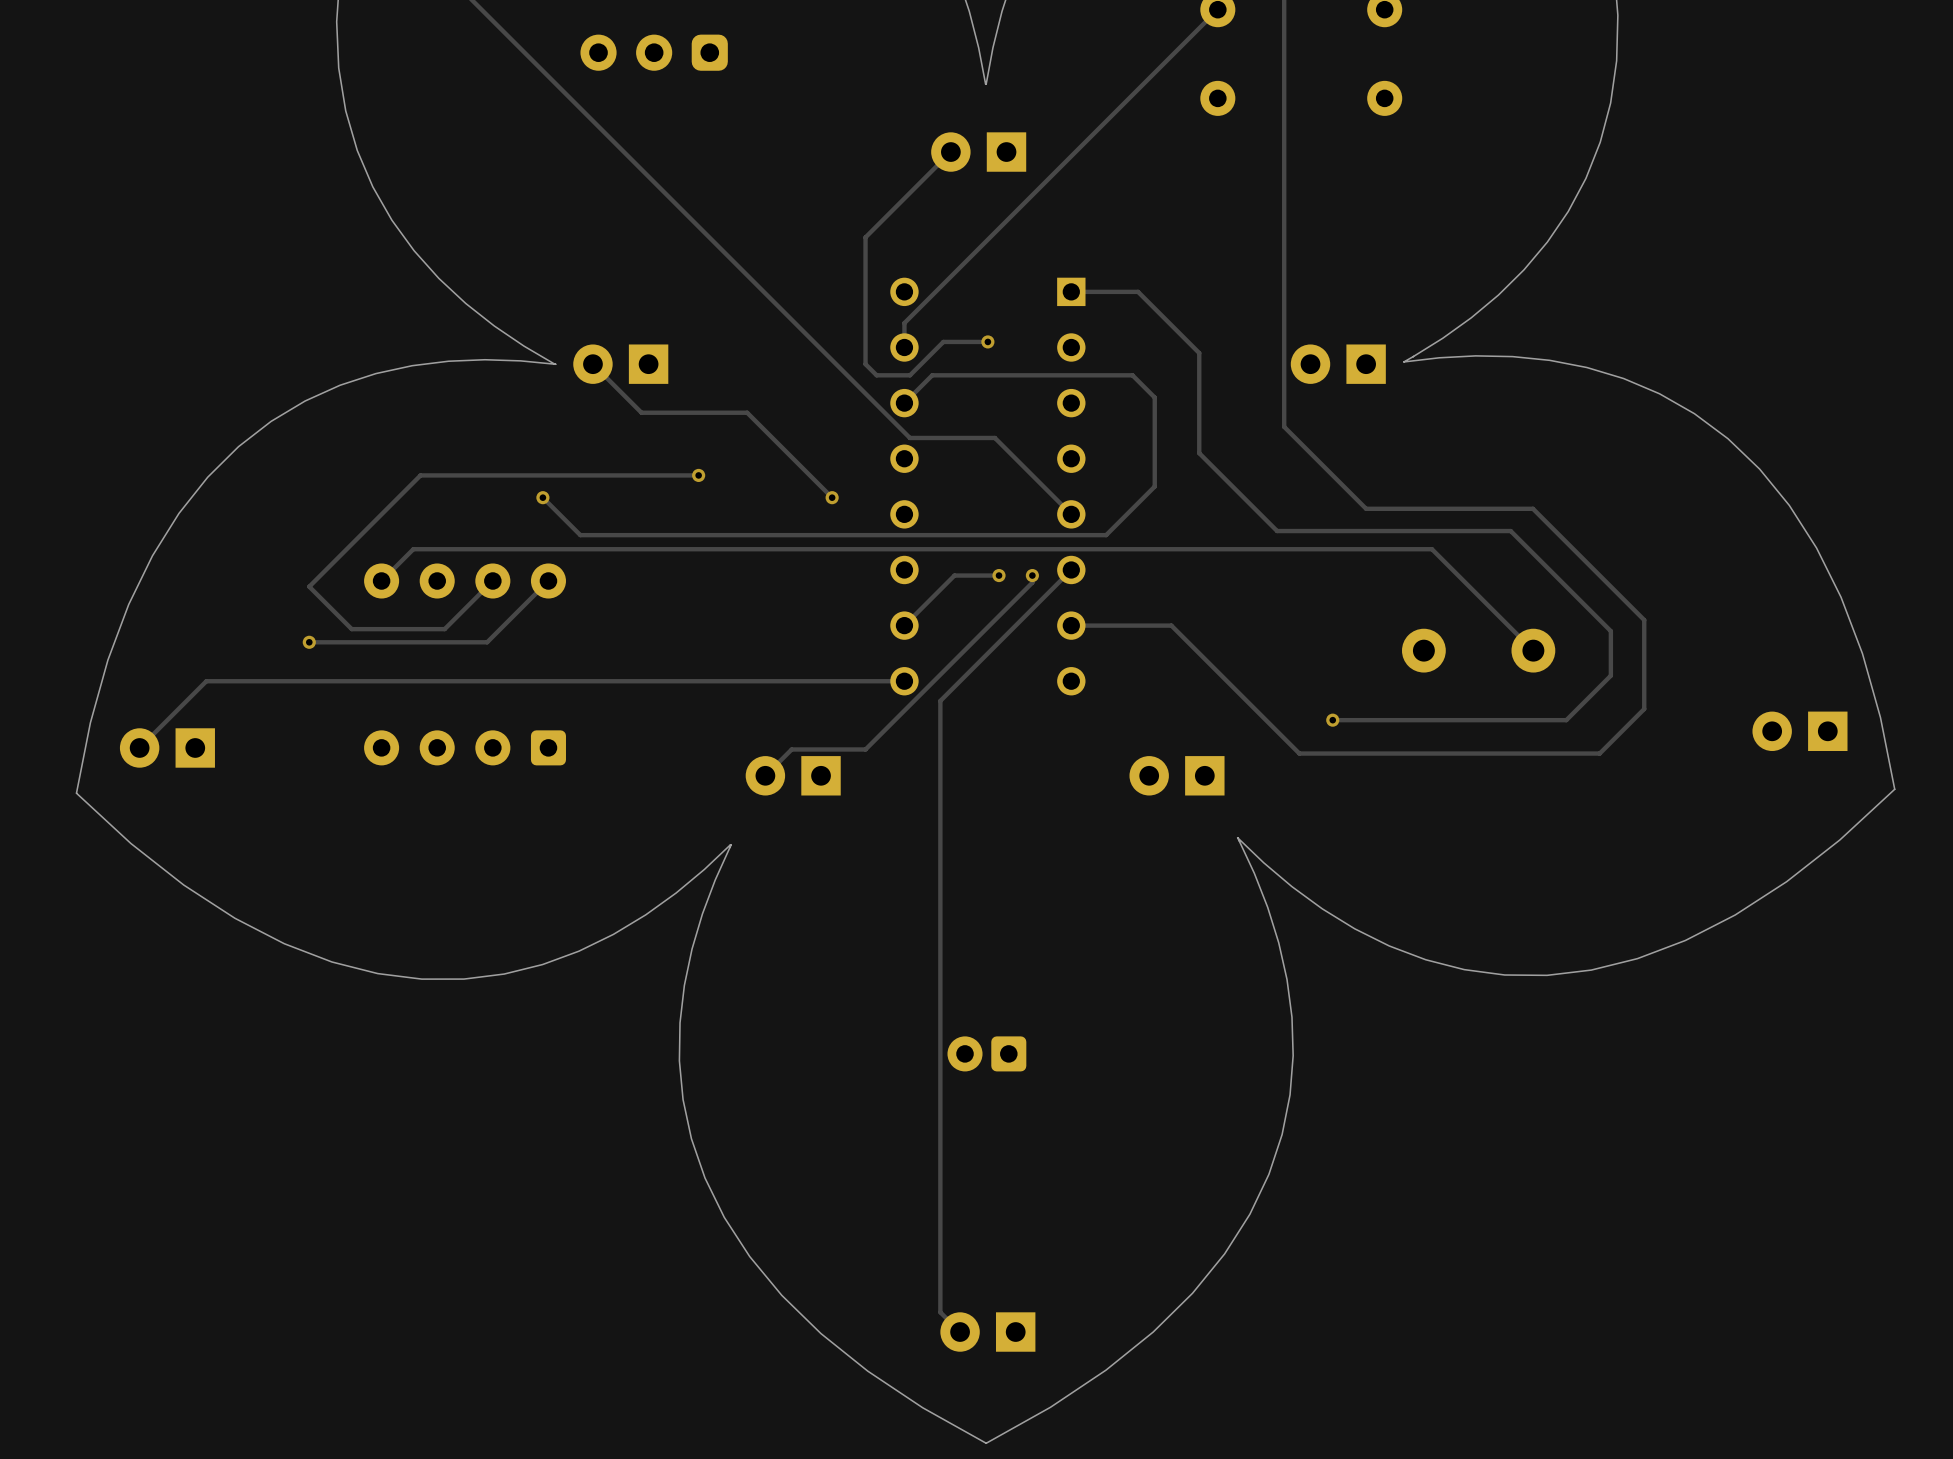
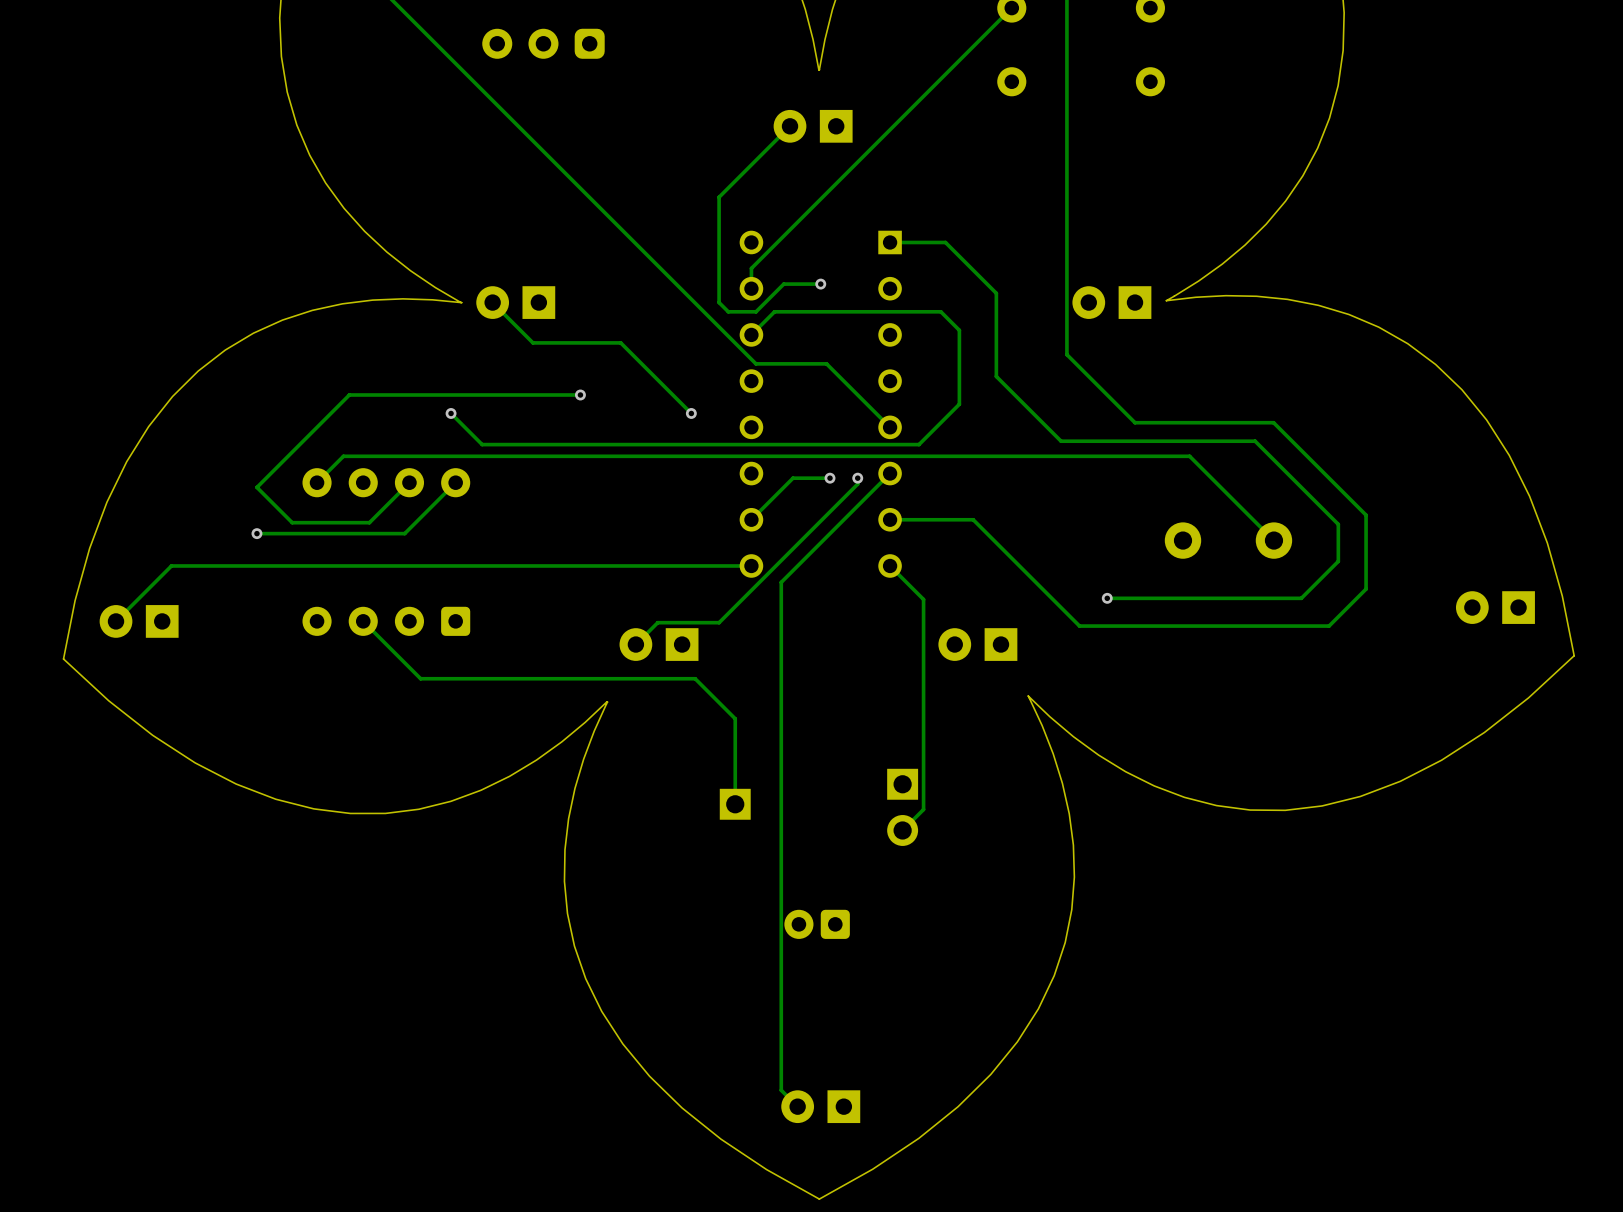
track: none -> (890, 565) (923, 599) (923, 809) (902, 830)
track: none -> (363, 621) (420, 678) (695, 678) (735, 718) (735, 804)
part: none -> (735, 804)
part: none -> (902, 807)
part position: (986, 1053) -> (817, 924)

